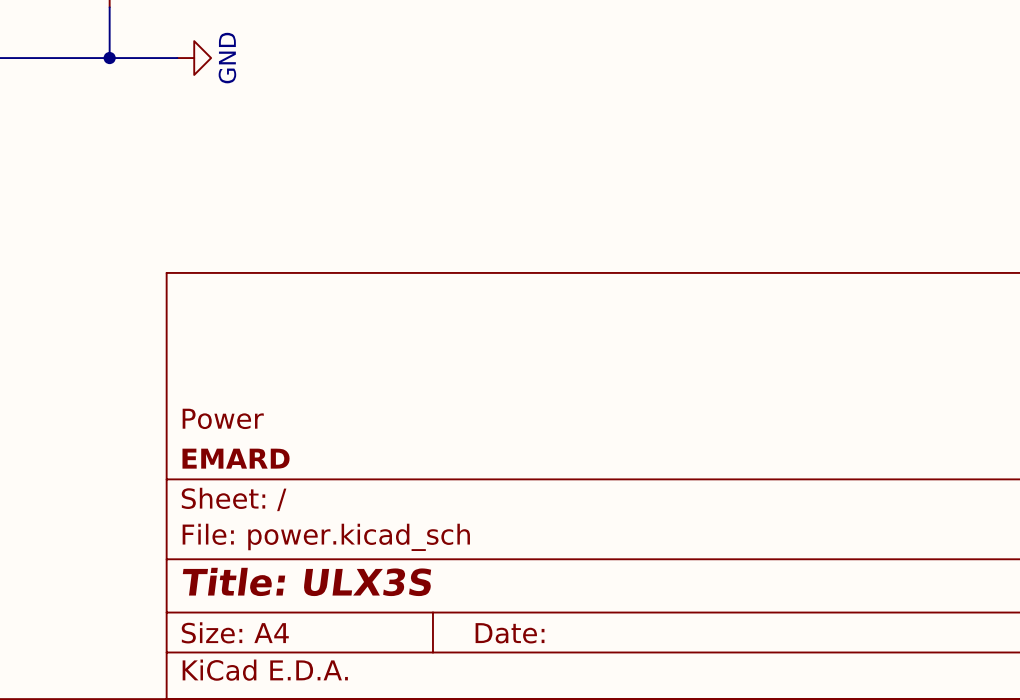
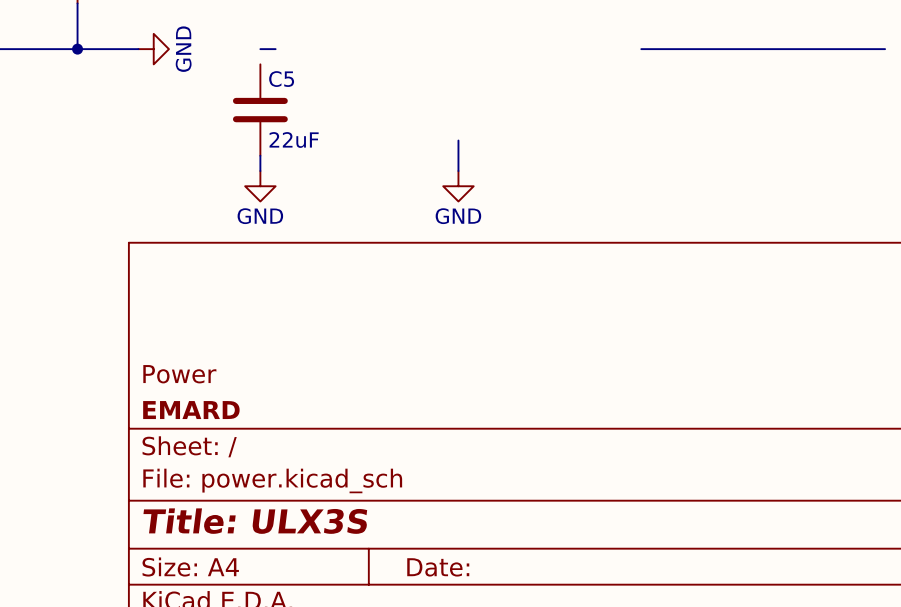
wire: none -> (260, 49) (275, 49)
wire: none -> (641, 49) (885, 49)
C5: none -> 22uF (260, 110)
wire: none -> (458, 140) (458, 171)
wire: none -> (260, 155) (260, 171)
power symbol: none -> GND (260, 186)
power symbol: none -> GND (458, 186)

